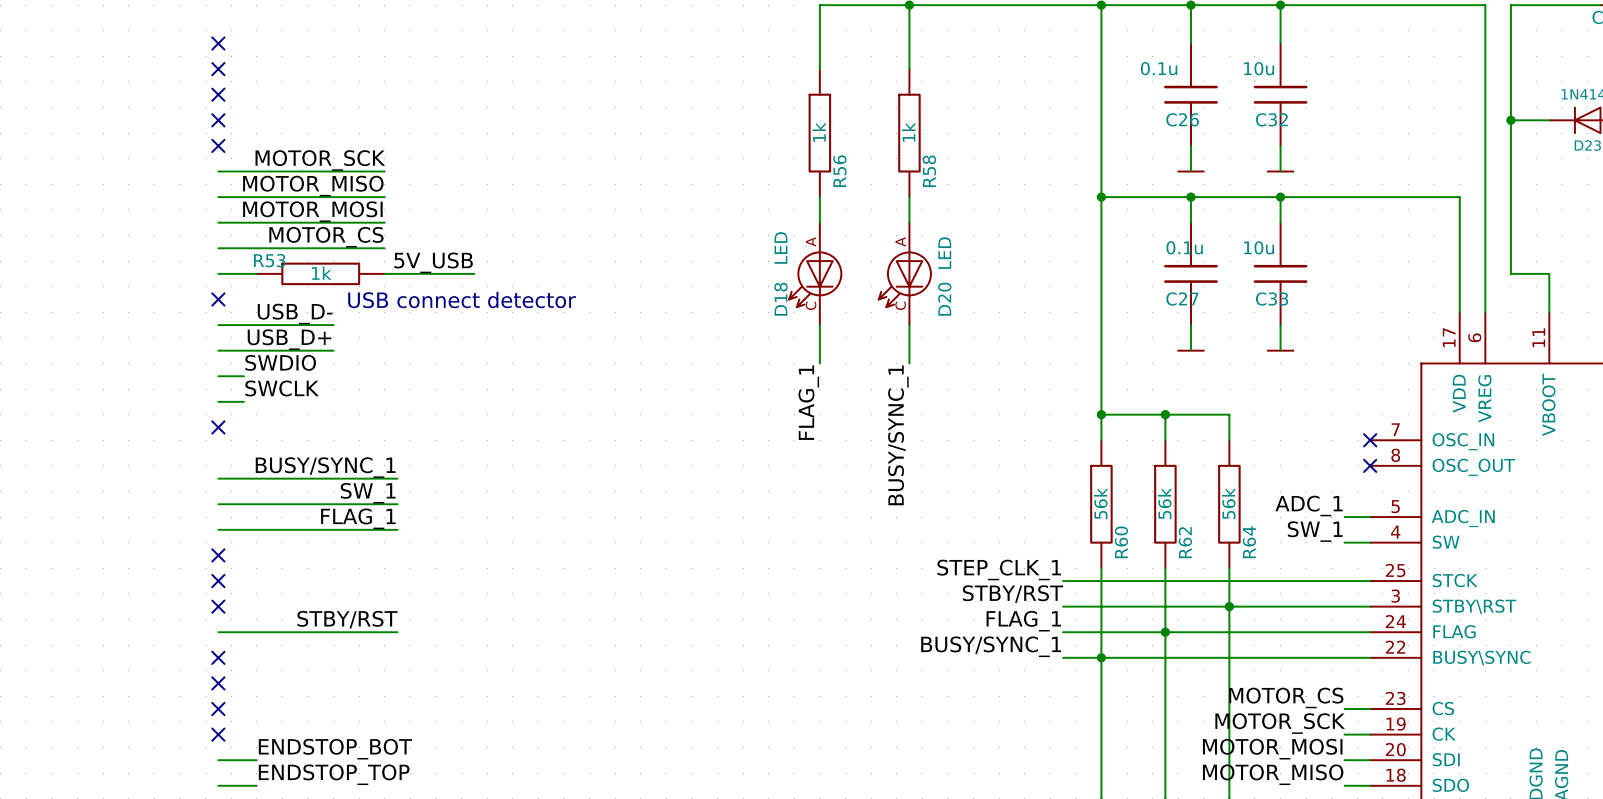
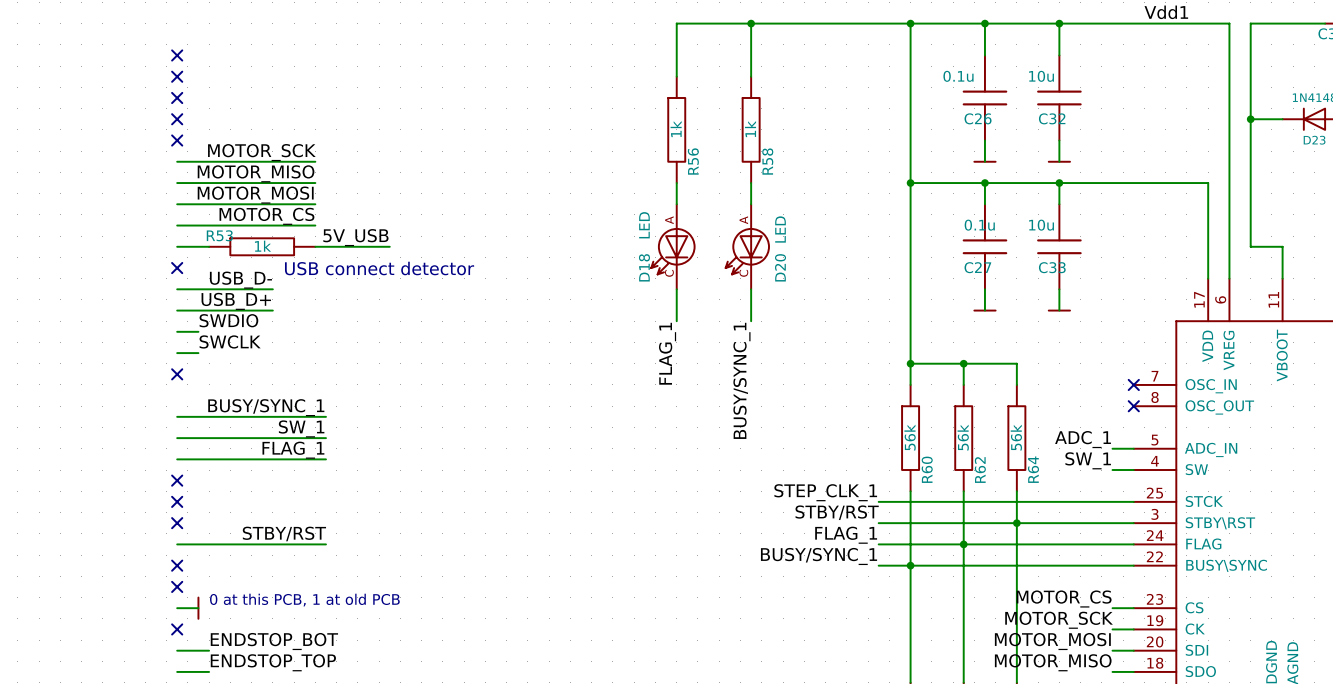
text: none -> 0 at this PCB, 1 at old PCB (304, 600)
wire: none -> (177, 608) (198, 608)
no-connect mark: (218, 709) -> none
power symbol: none -> (198, 608)

